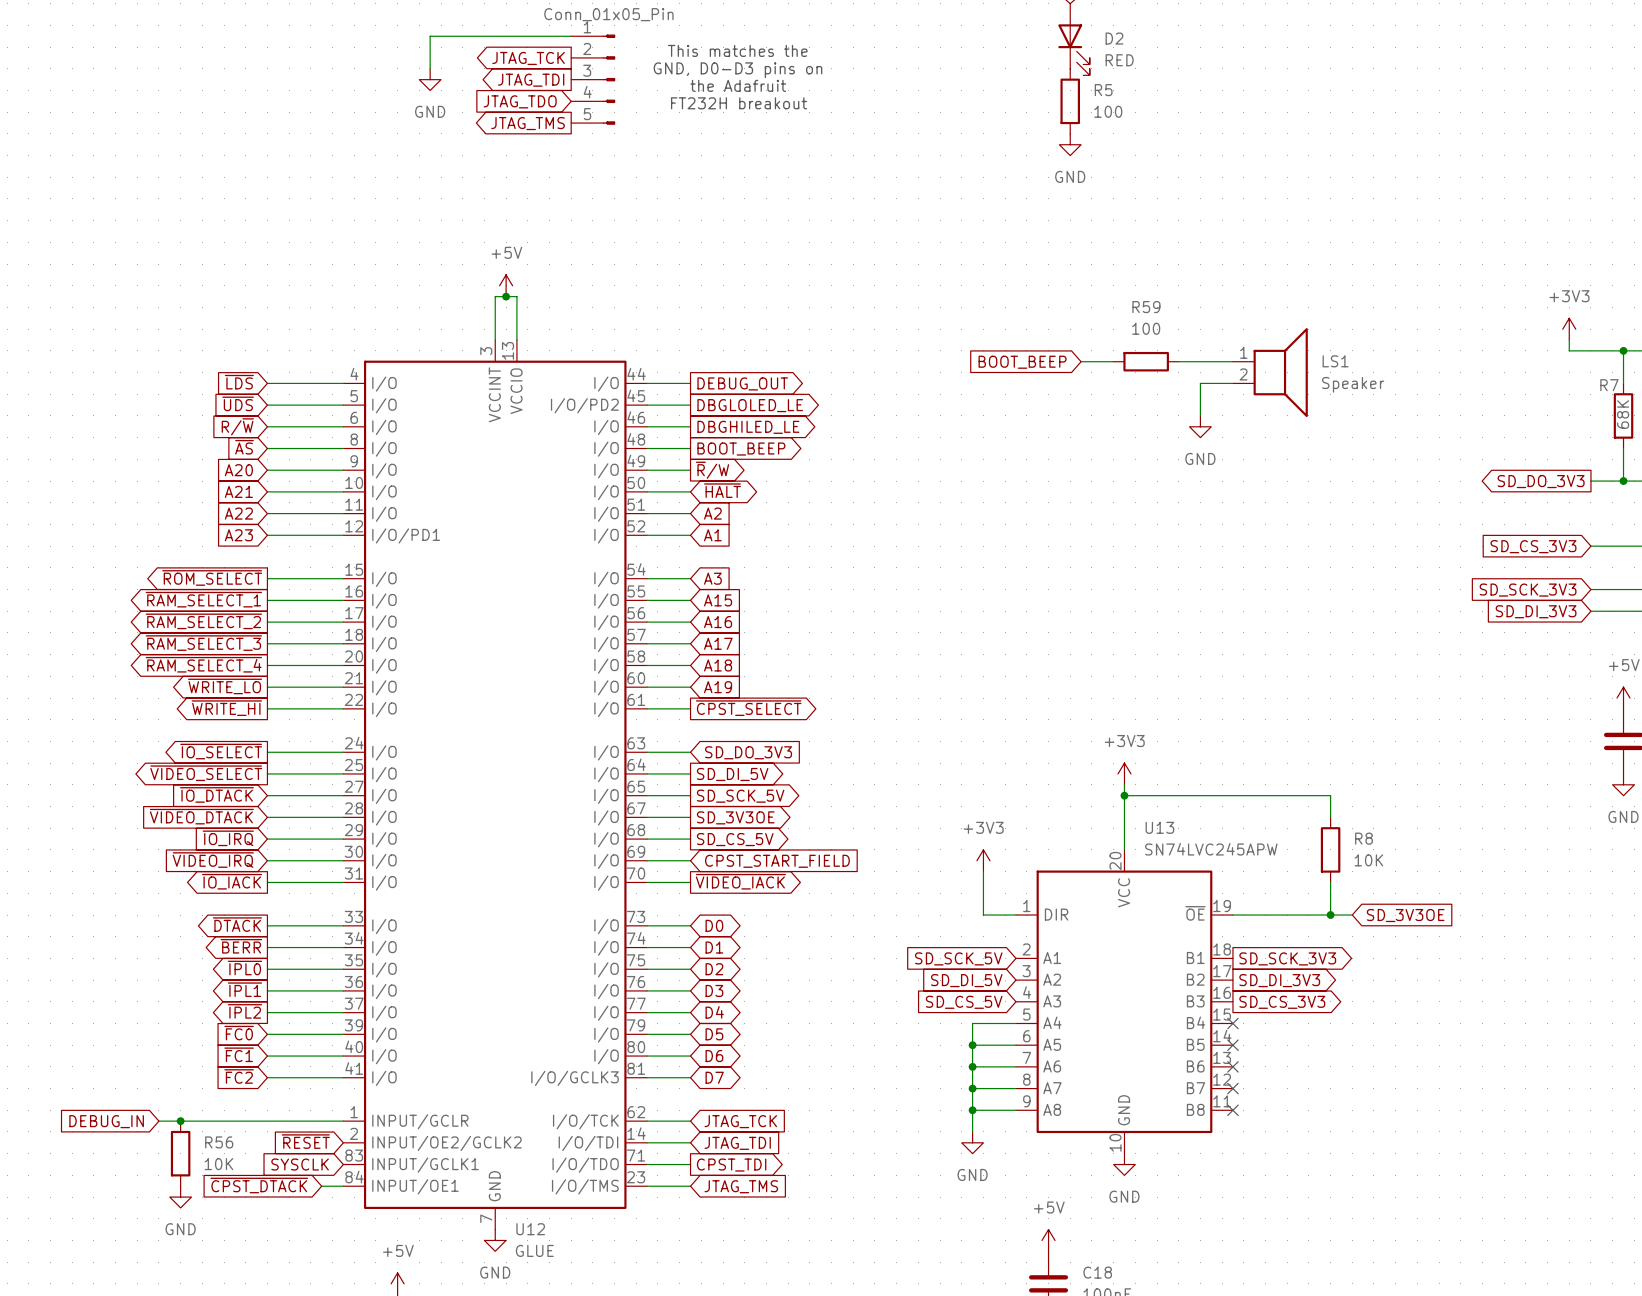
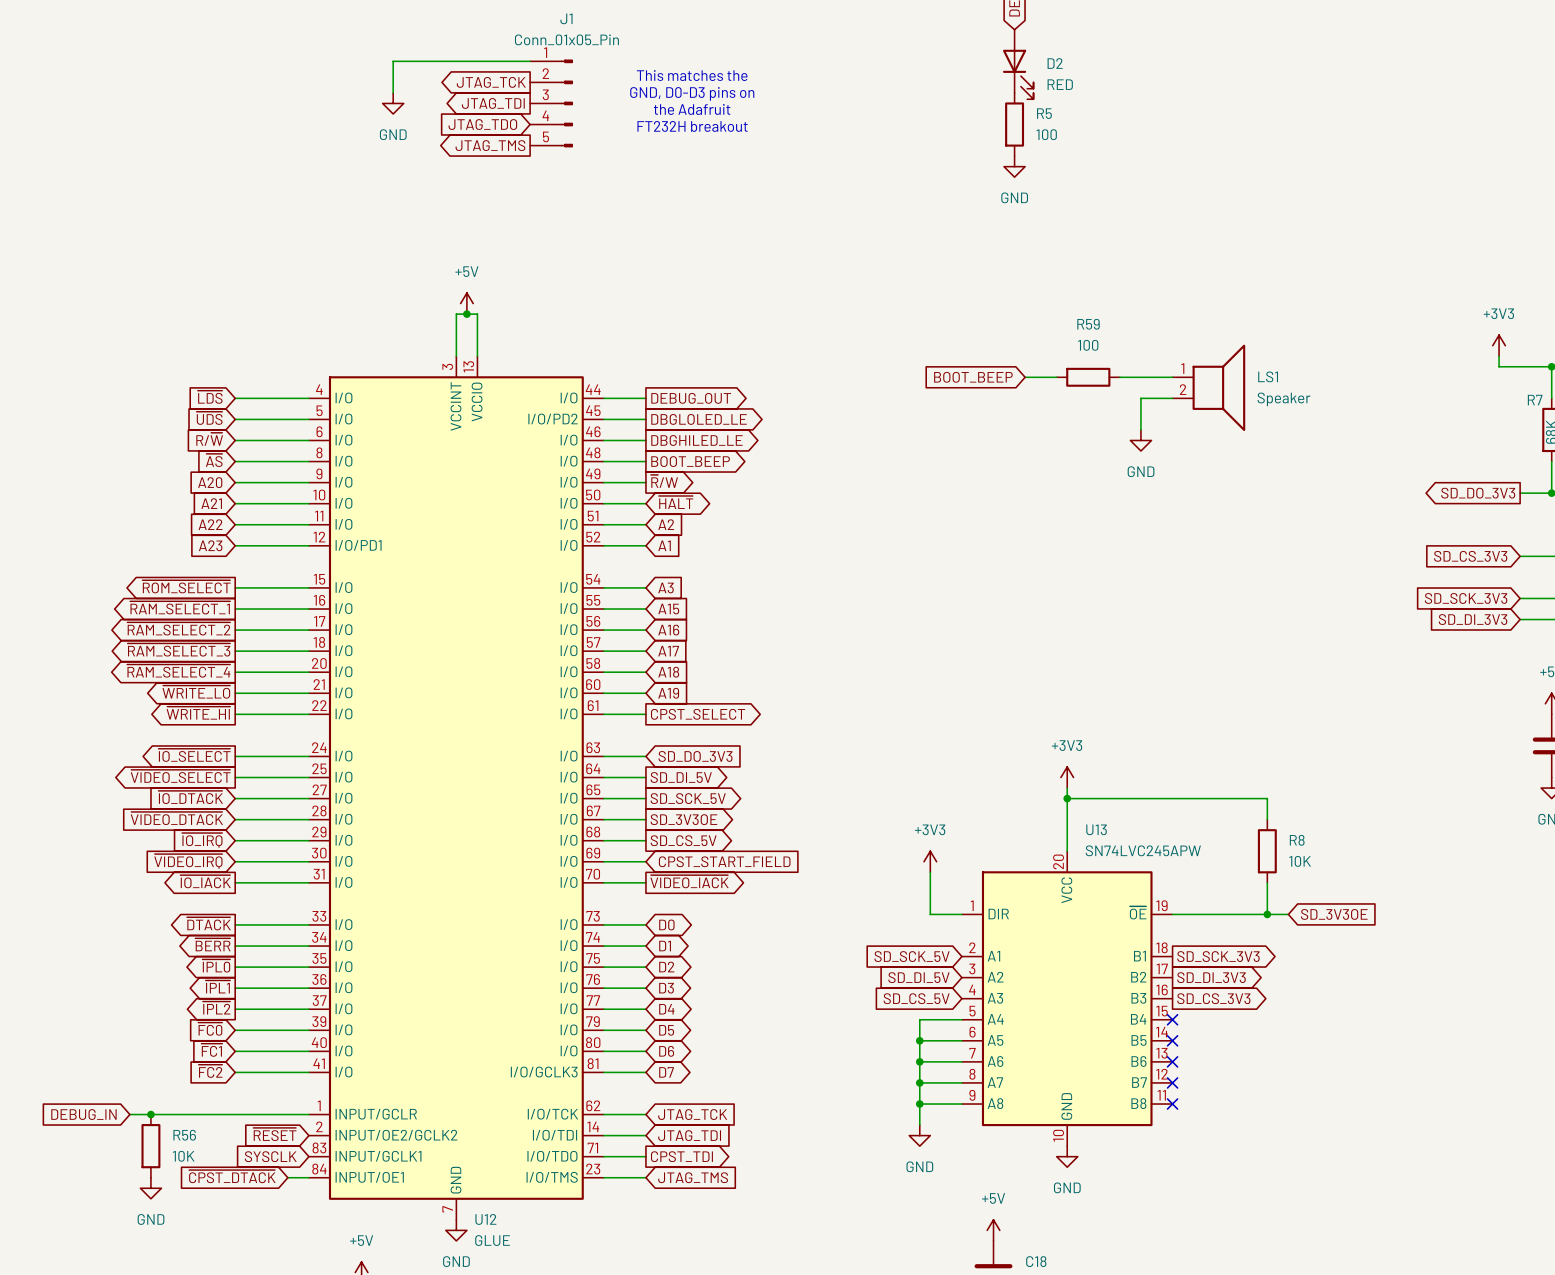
global label: ~{CPST_SELECT} (748, 708) -> CPST_SELECT (698, 714)

